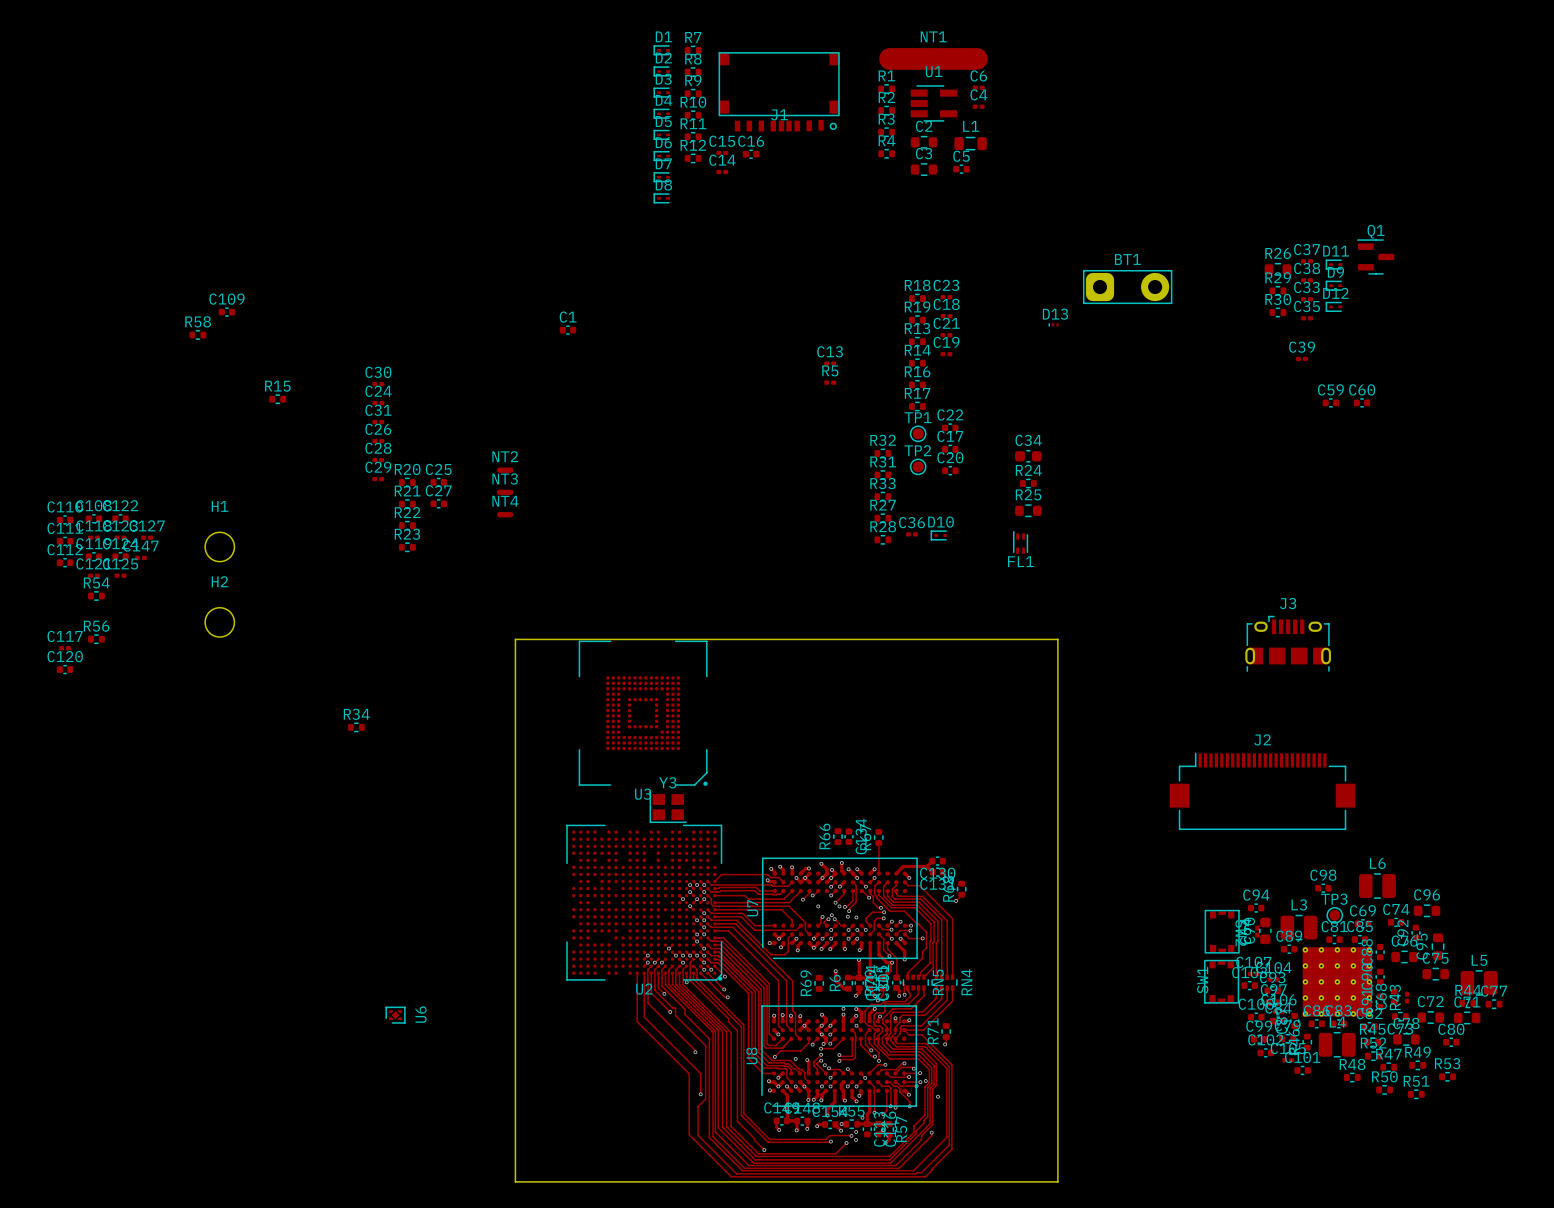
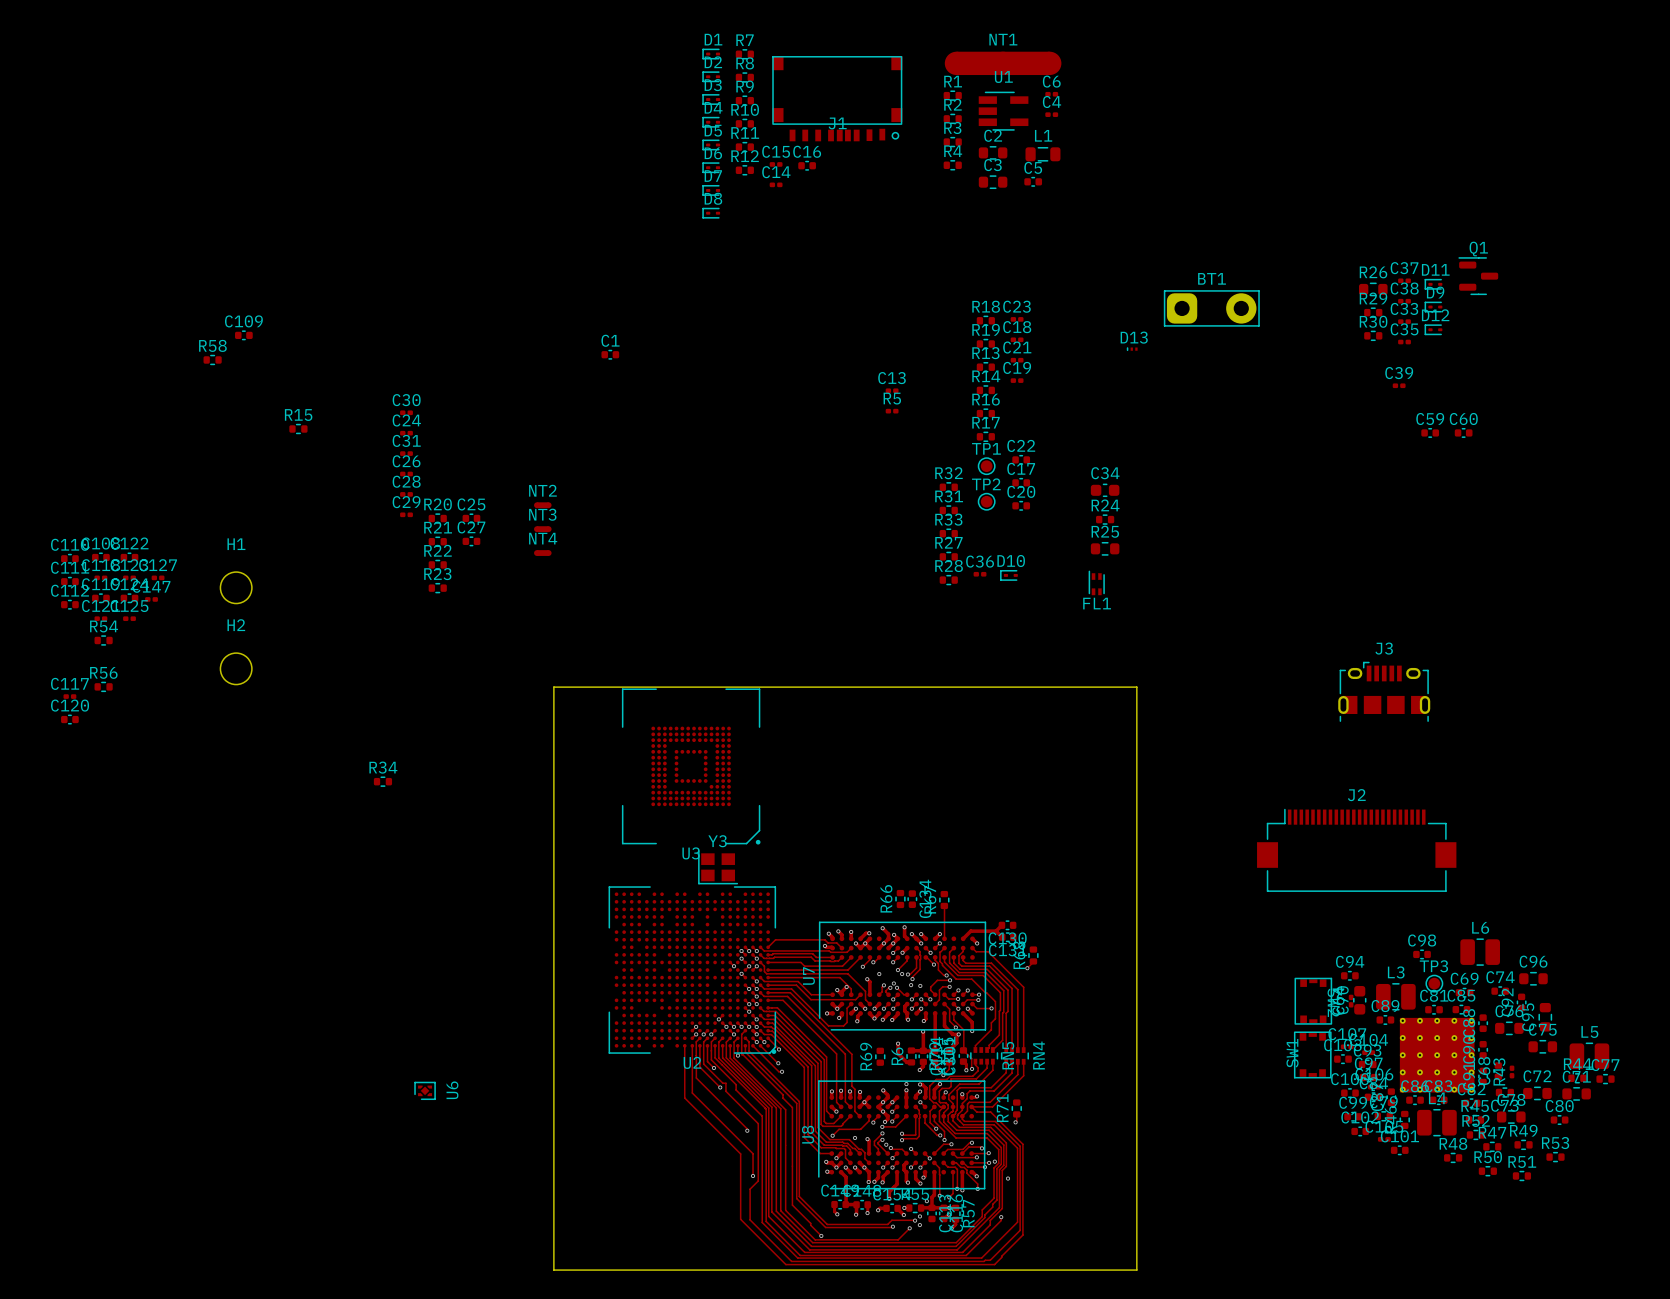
track: none -> (867, 979) (869, 981) (869, 994)
via: none -> (867, 979)
track: none -> (846, 986) (841, 991) (841, 994) (837, 990)
via: none -> (846, 986)
via: none -> (837, 990)
track: none -> (860, 1004) (865, 1008)
track: none -> (907, 1004) (904, 1006) (907, 1013)
via: none -> (865, 1008)

